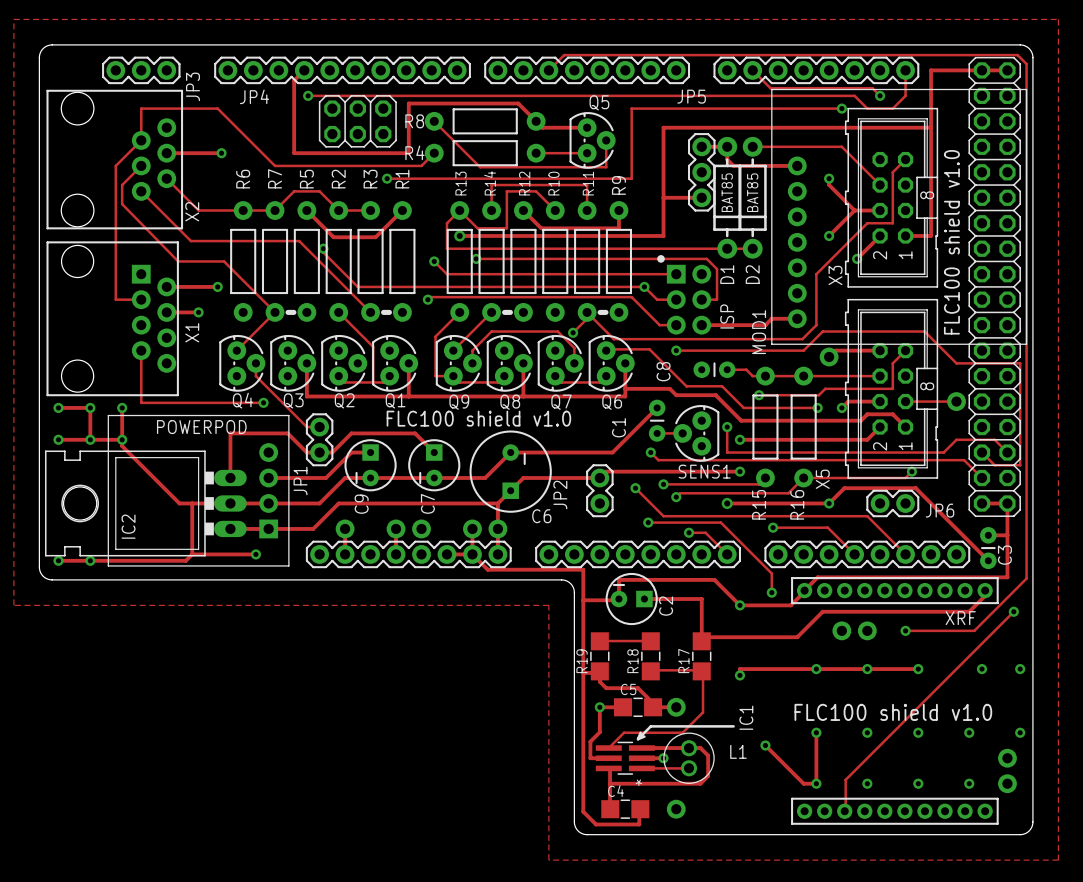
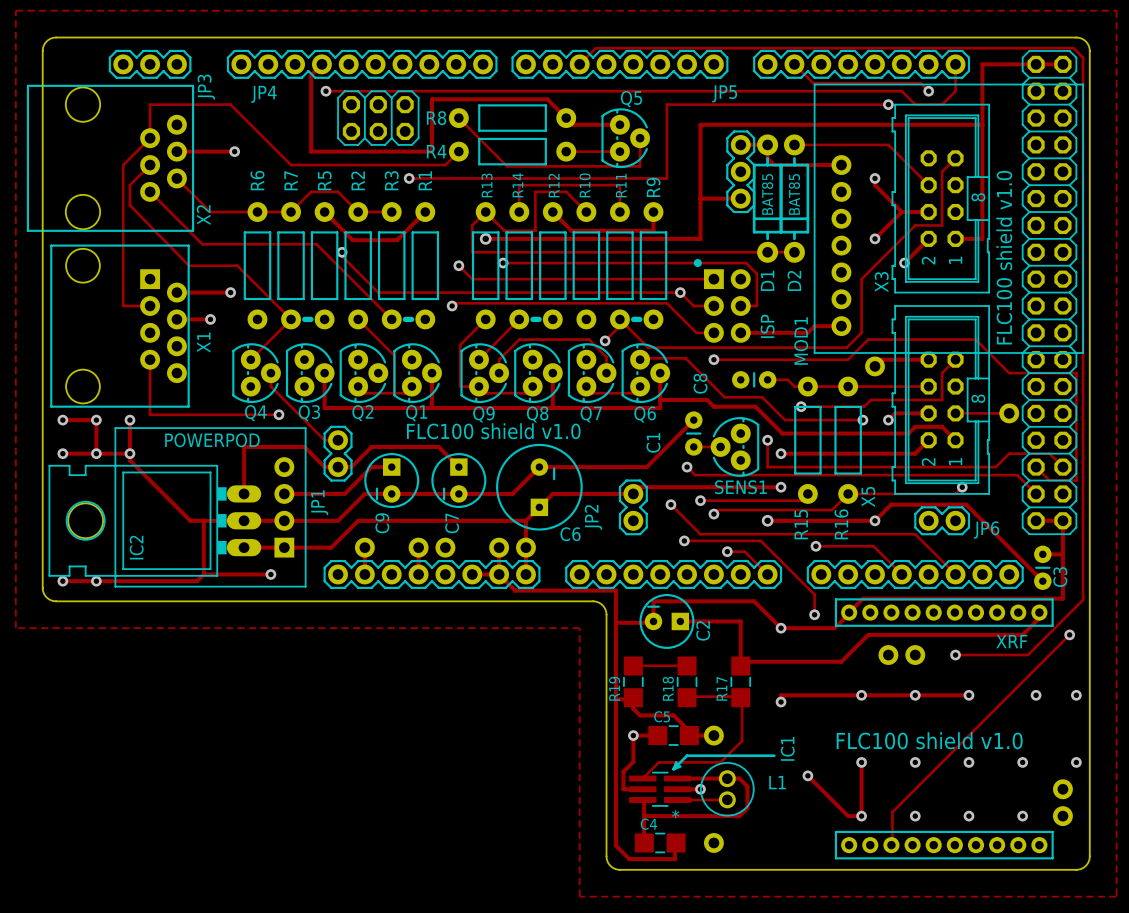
X2 footprint: [46, 89, 184, 230] -> [26, 84, 195, 232]

